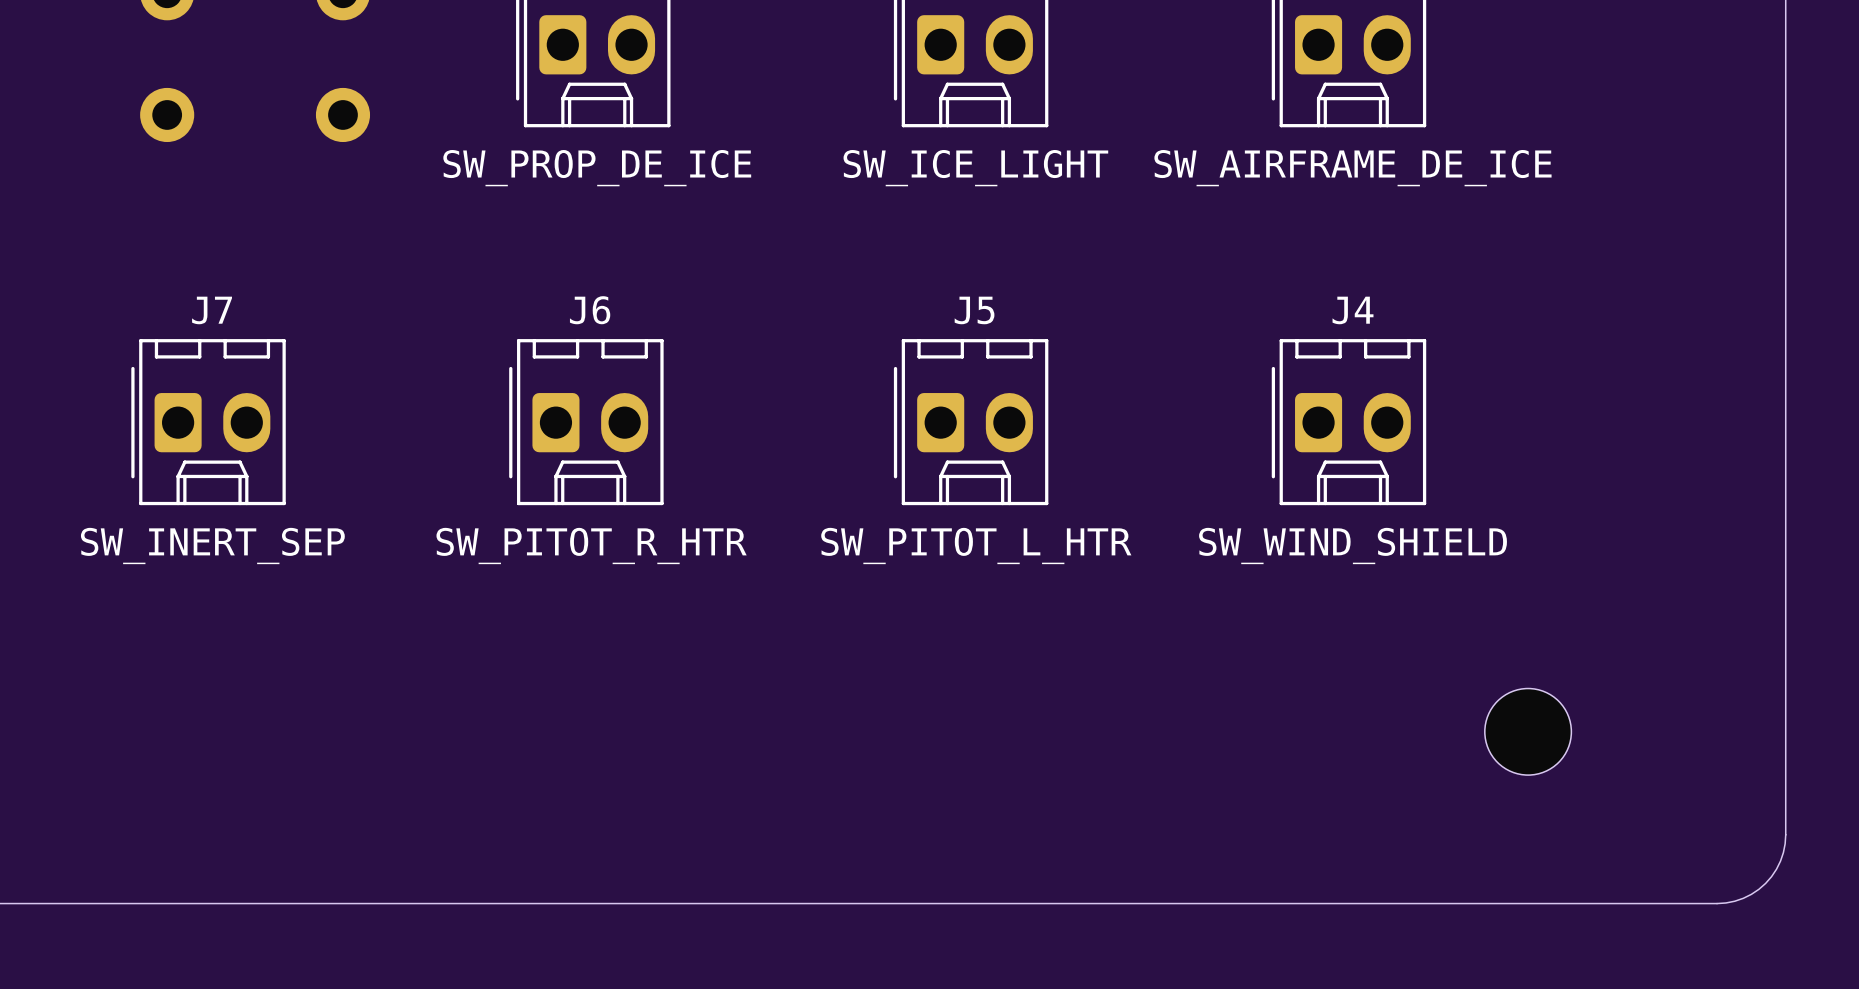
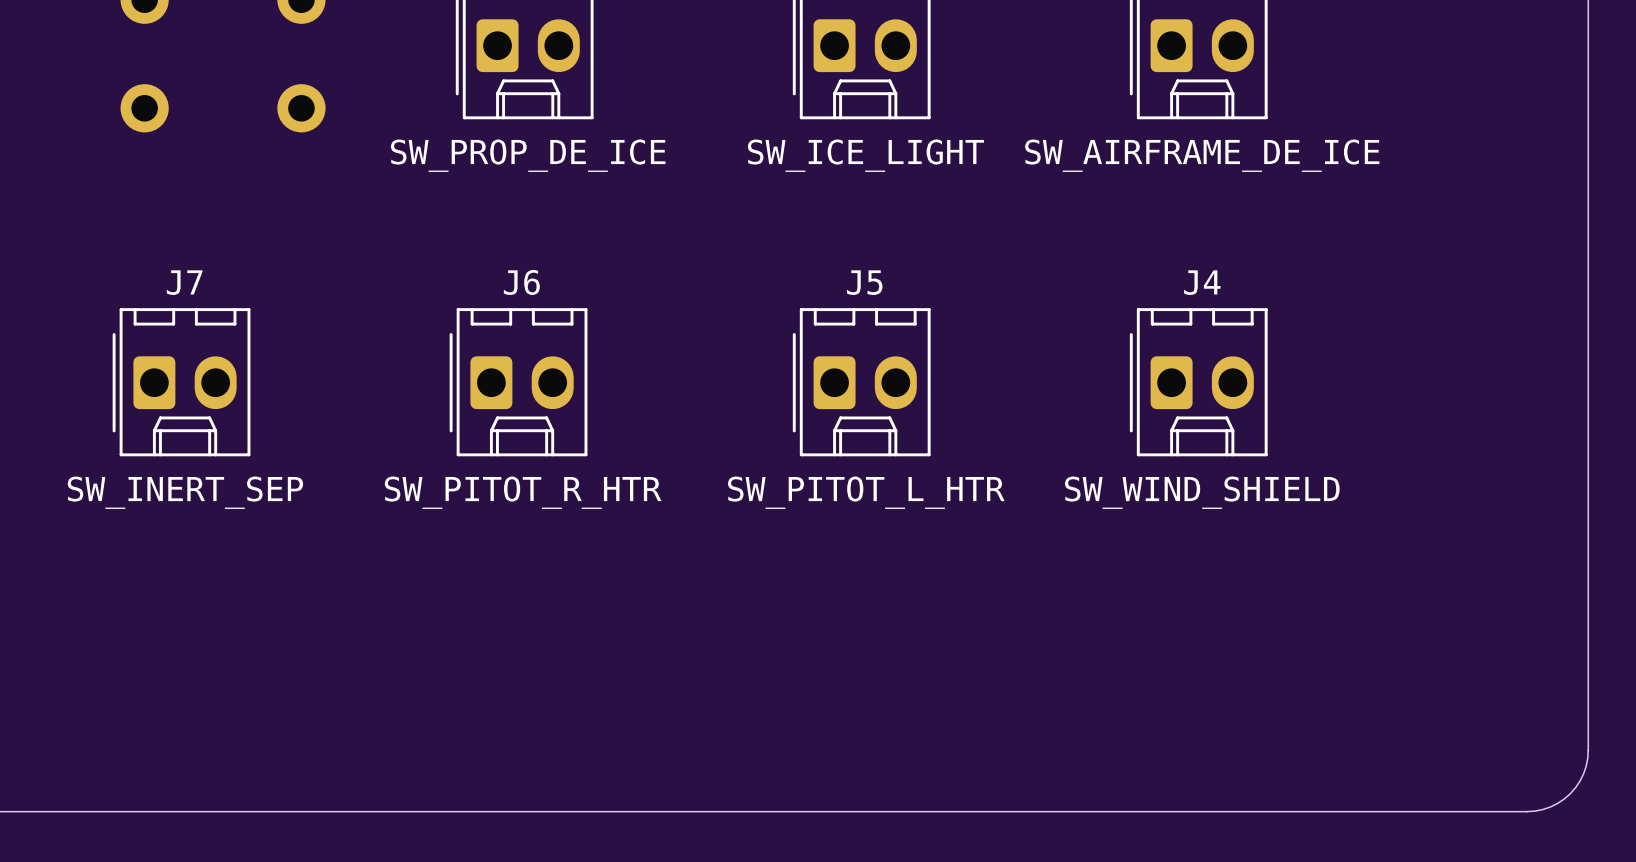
part: (1528, 731) -> none

